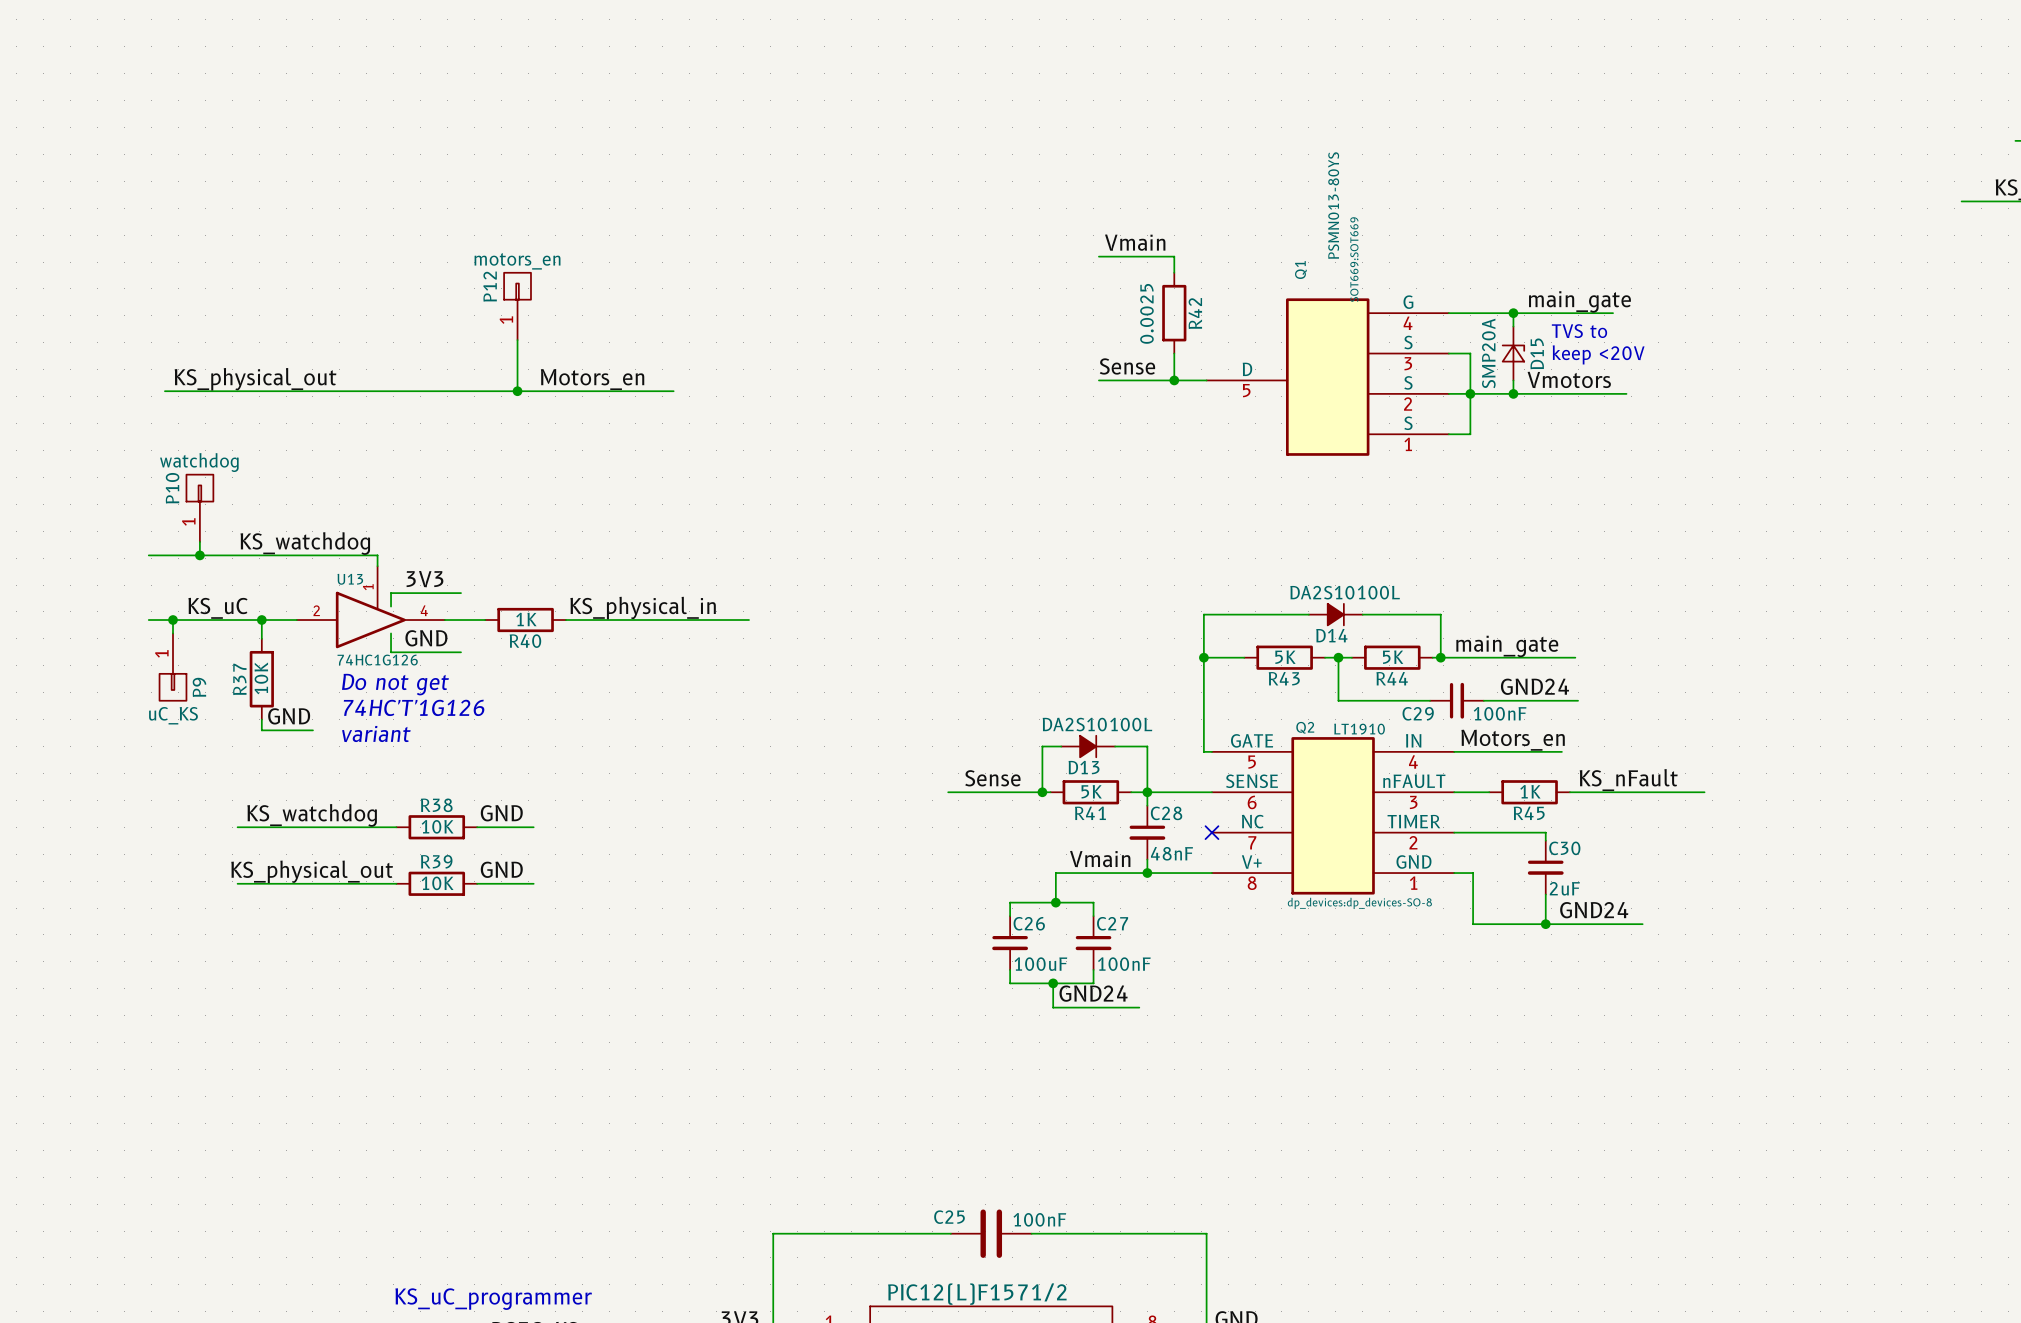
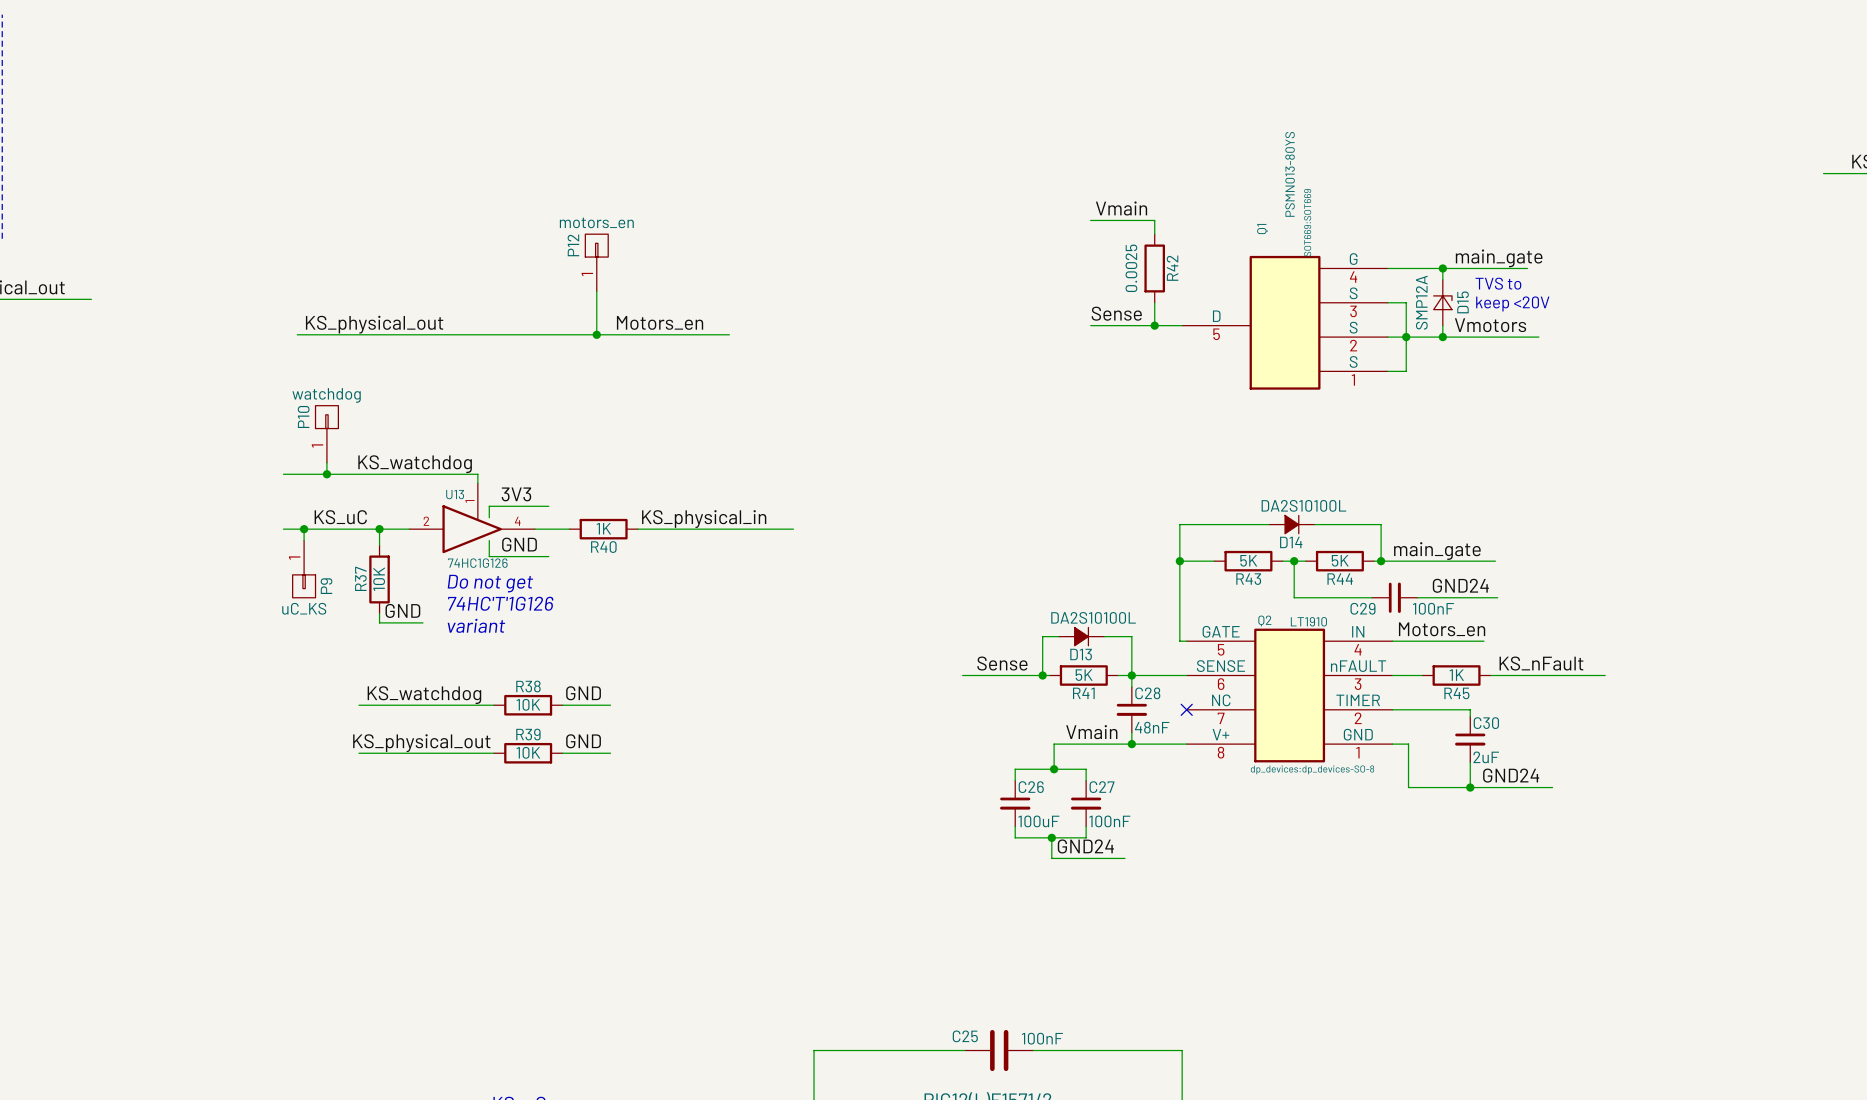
D15 value: SMP20A (1488, 353) -> SMP12A (1421, 302)

